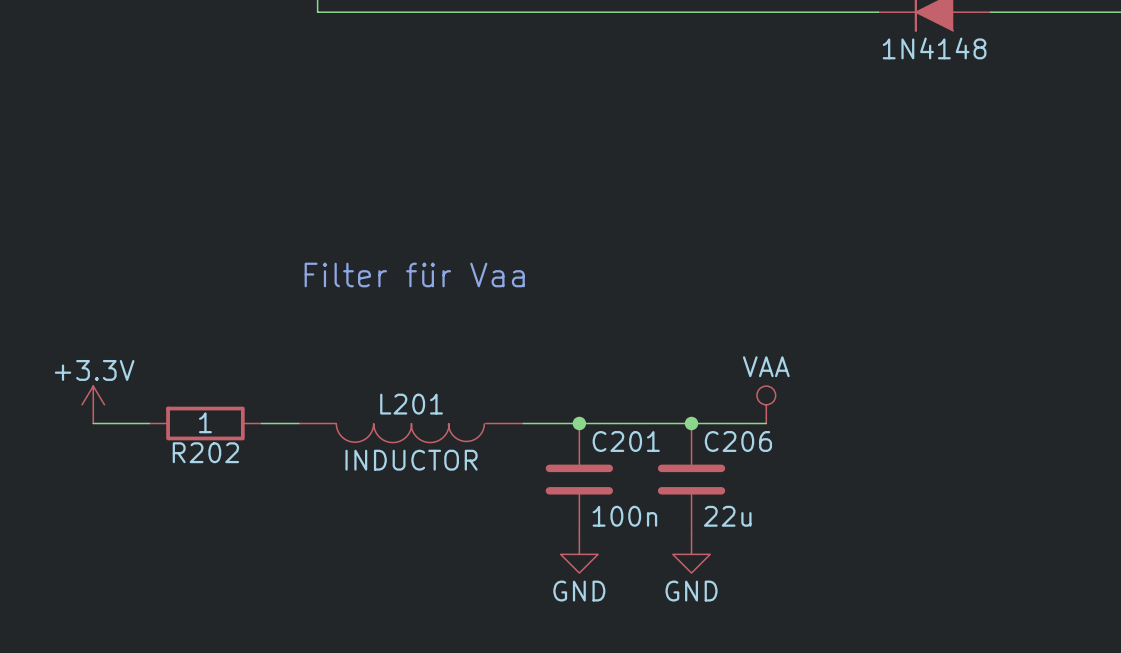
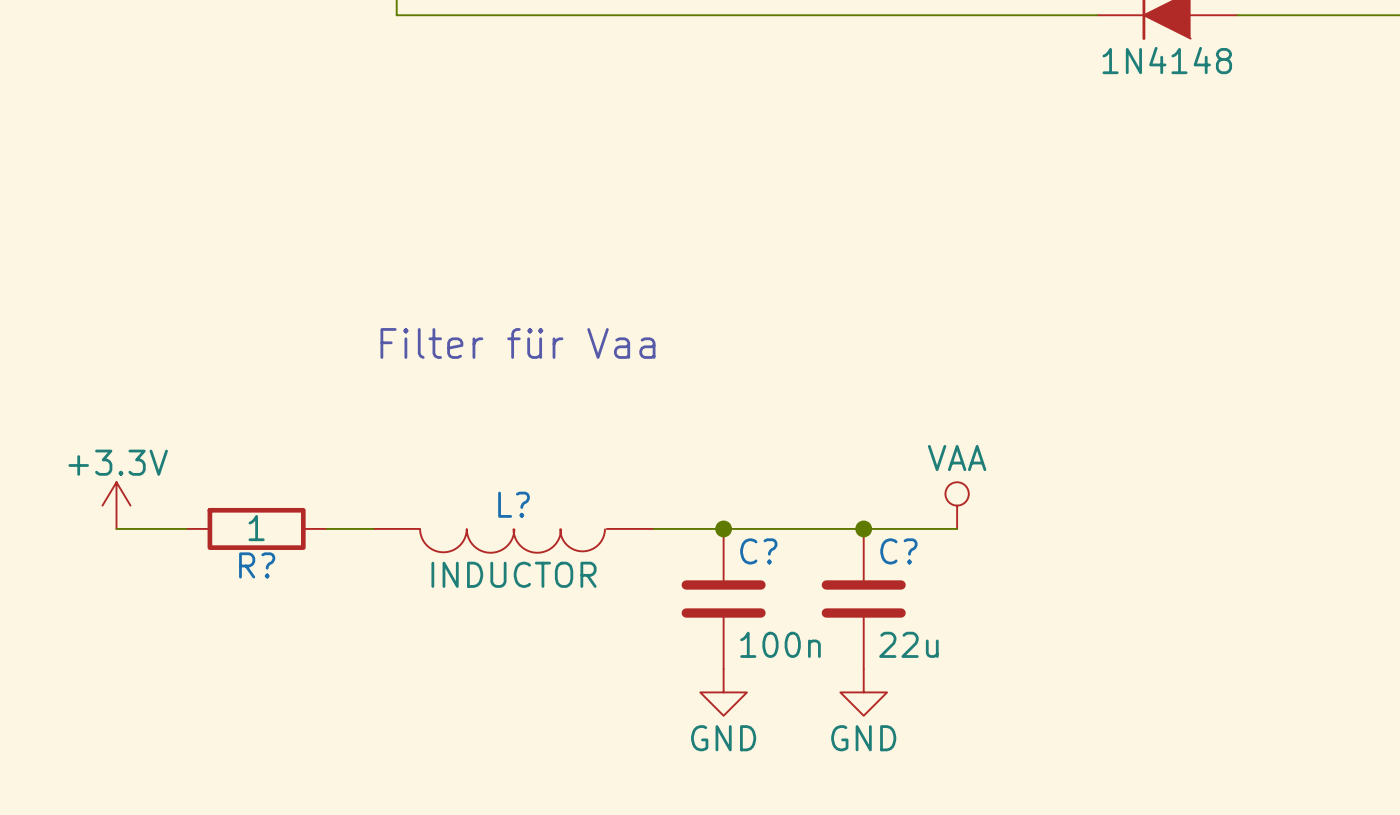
L201 name: L201 (411, 404) -> L? (514, 504)
C201 name: C201 (626, 441) -> C? (758, 551)
C206 name: C206 (738, 441) -> C? (898, 551)
R202 name: R202 (205, 452) -> R? (257, 565)

